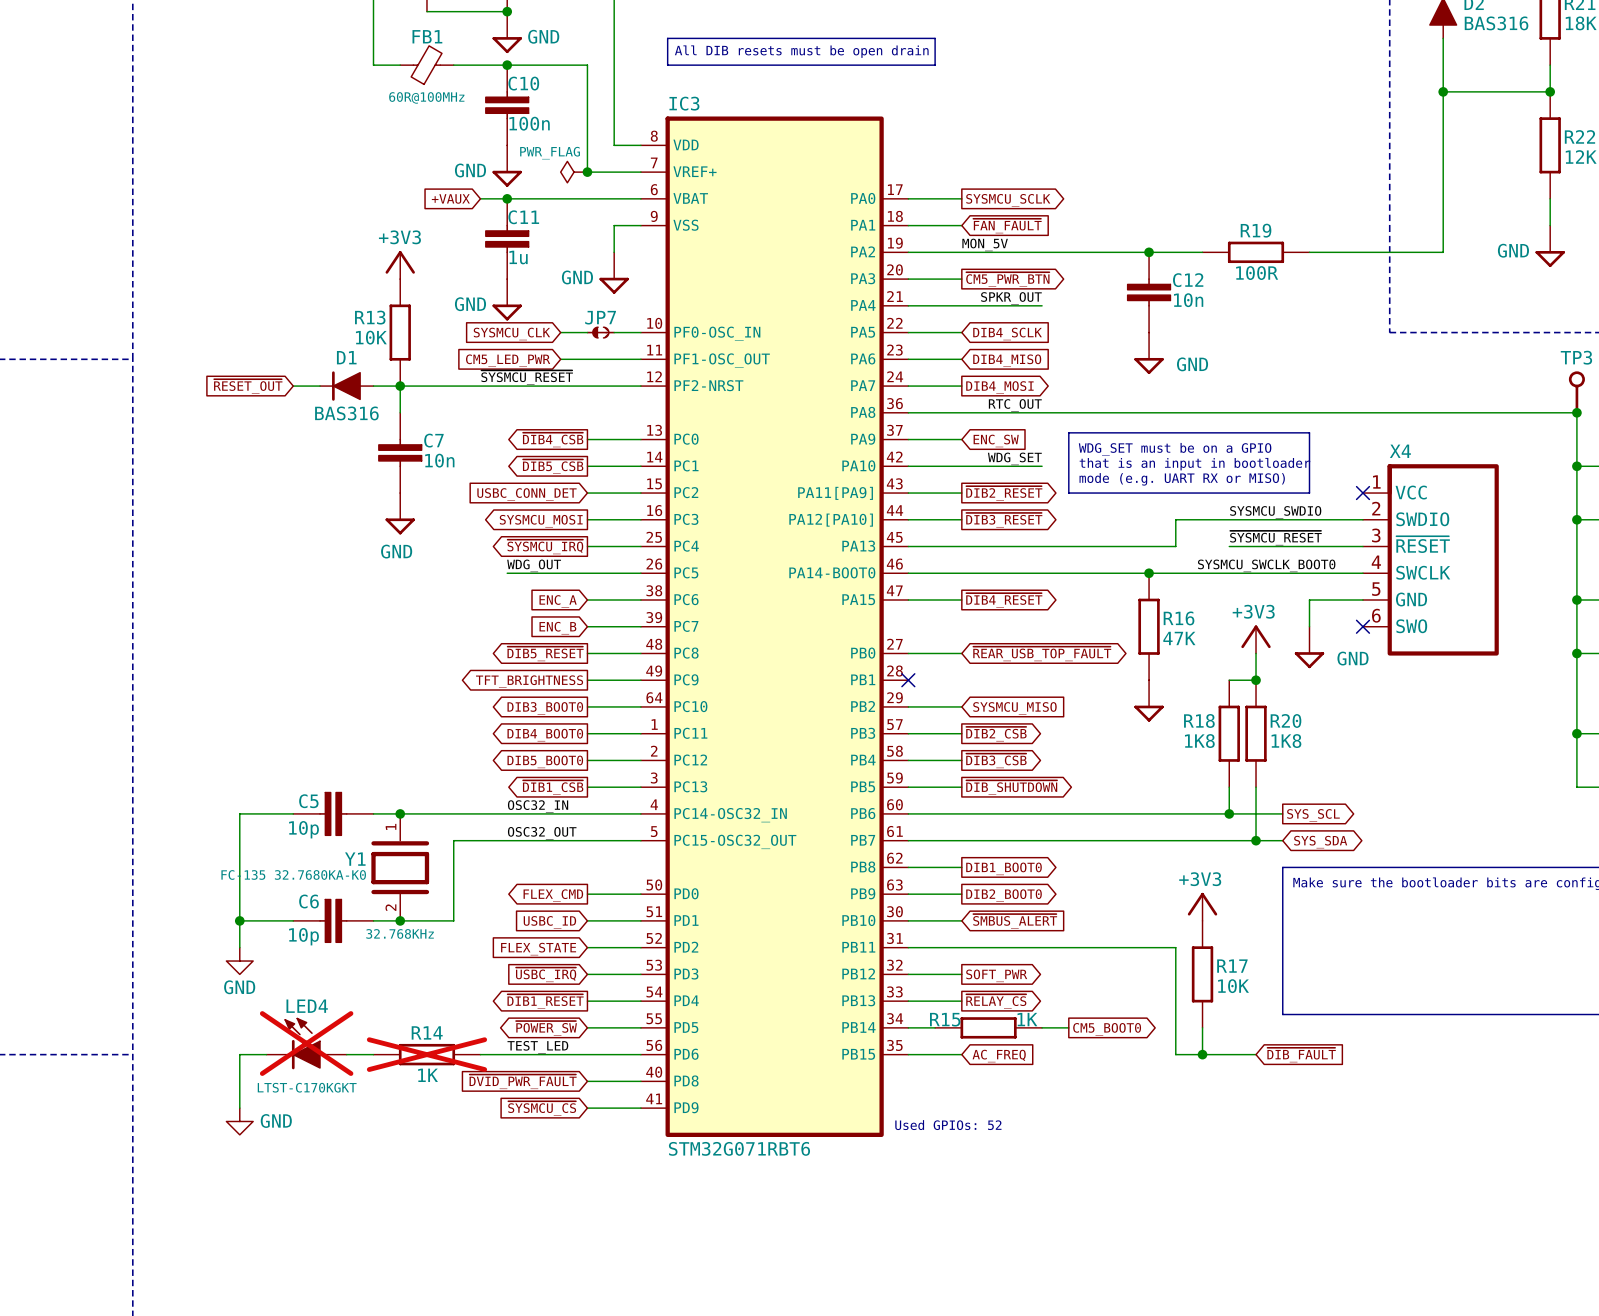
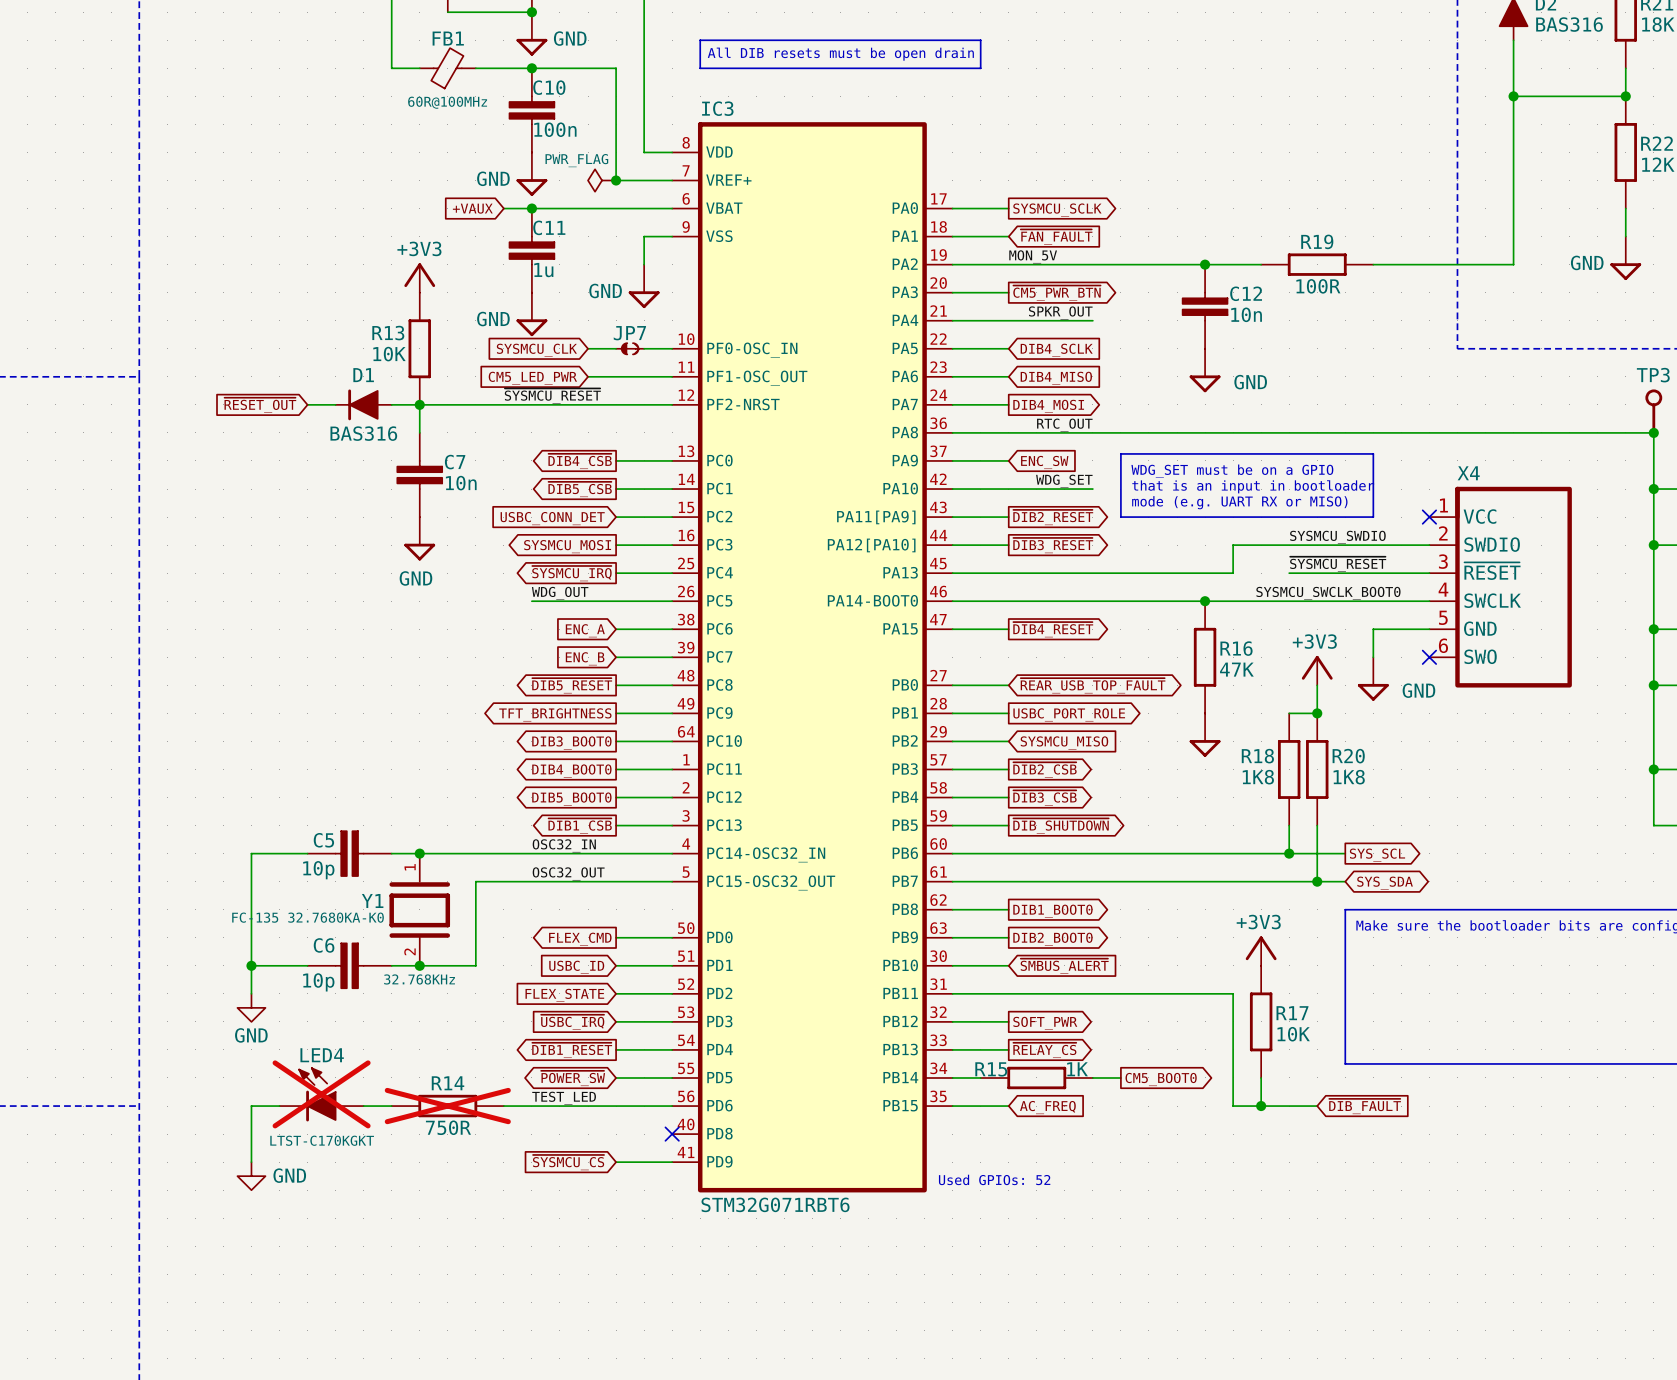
wire: none -> (952, 713) (1008, 713)
no-connect mark: (908, 680) -> none
global label: none -> USBC_PORT_ROLE (1069, 714)
R14 value: 1K (428, 1075) -> 750R (448, 1127)
global label: ~{DVID_PWR_FAULT} (523, 1081) -> none
wire: (587, 1081) (640, 1081) -> none
no-connect mark: none -> (672, 1134)

